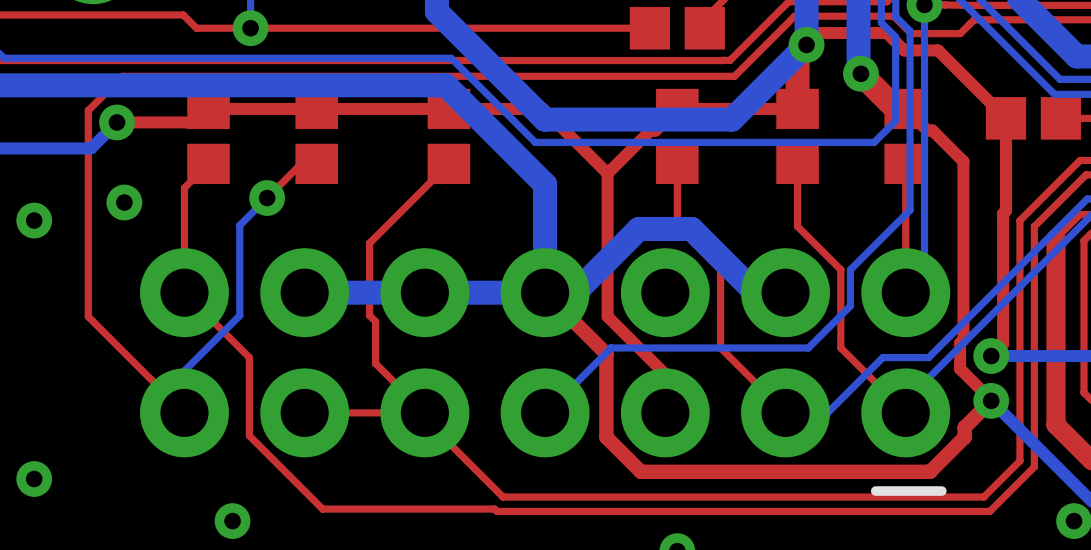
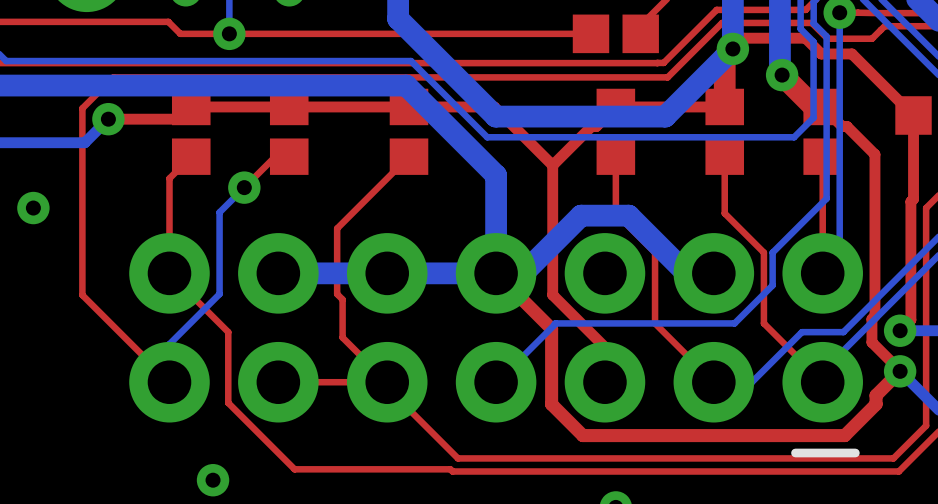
via: (124, 202) -> none
via: (34, 479) -> none

